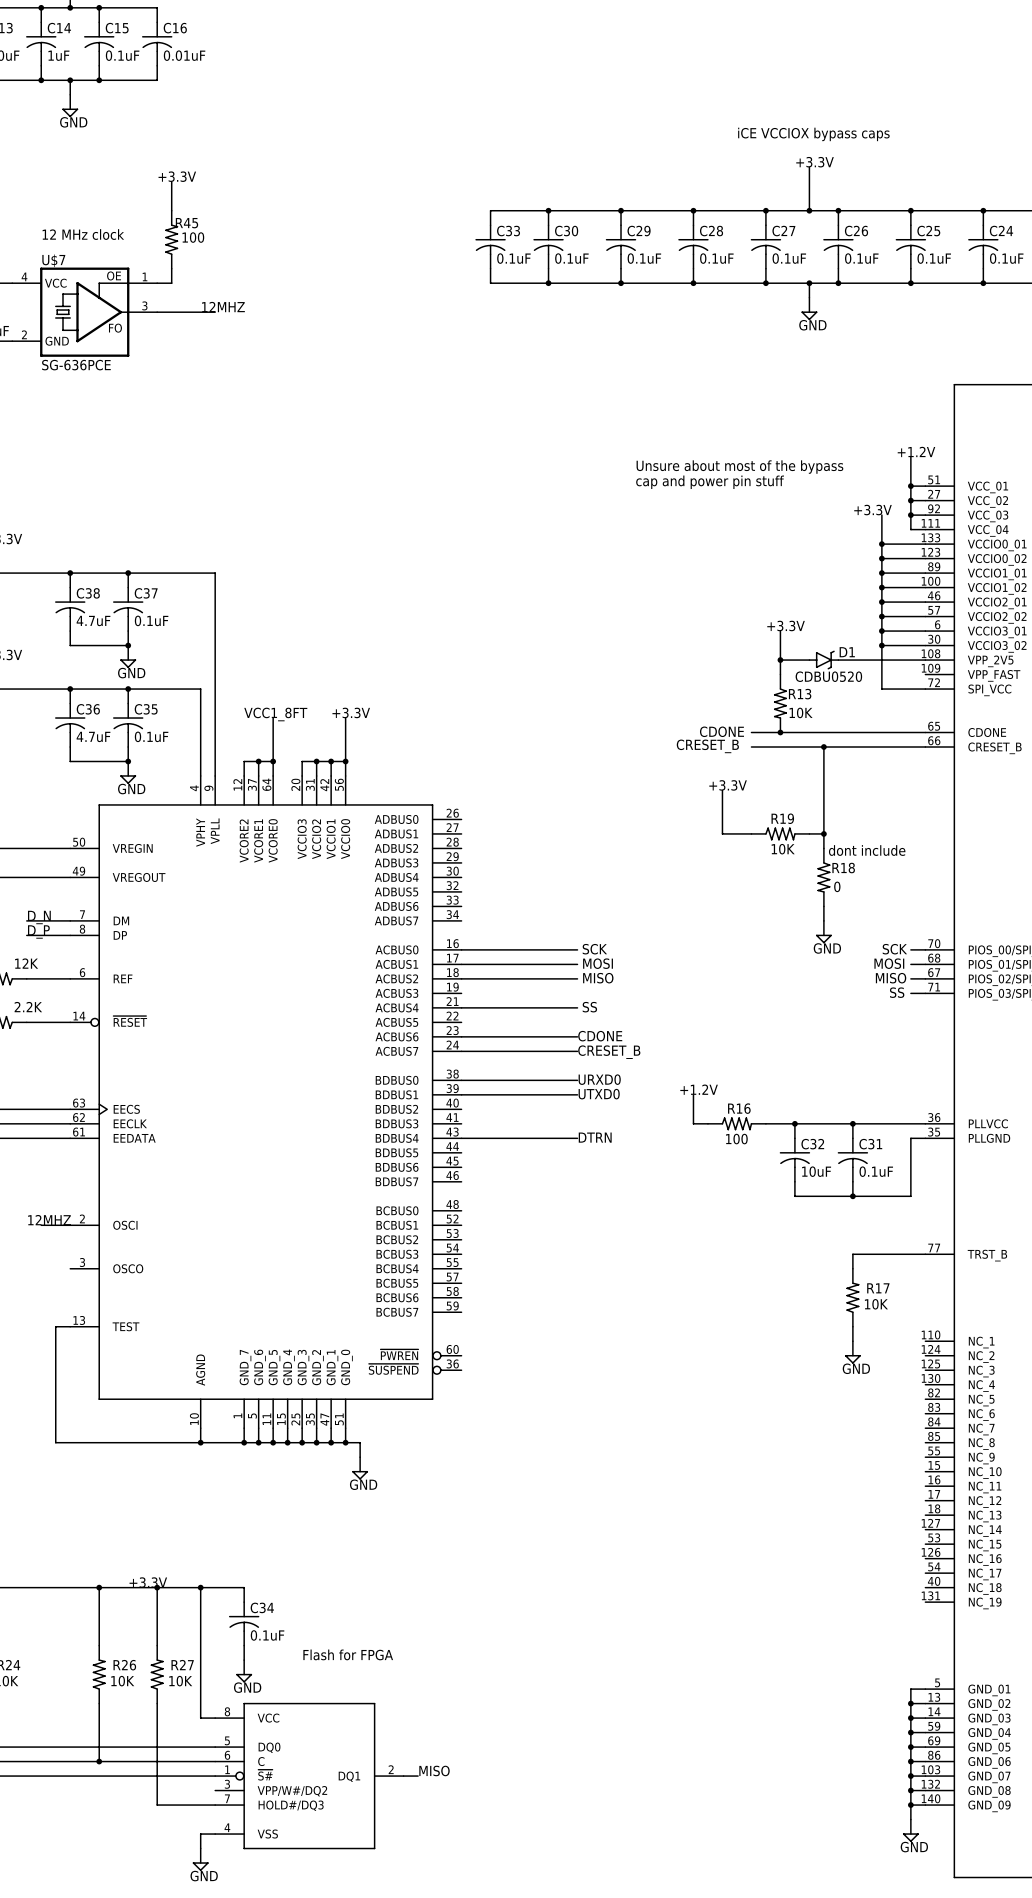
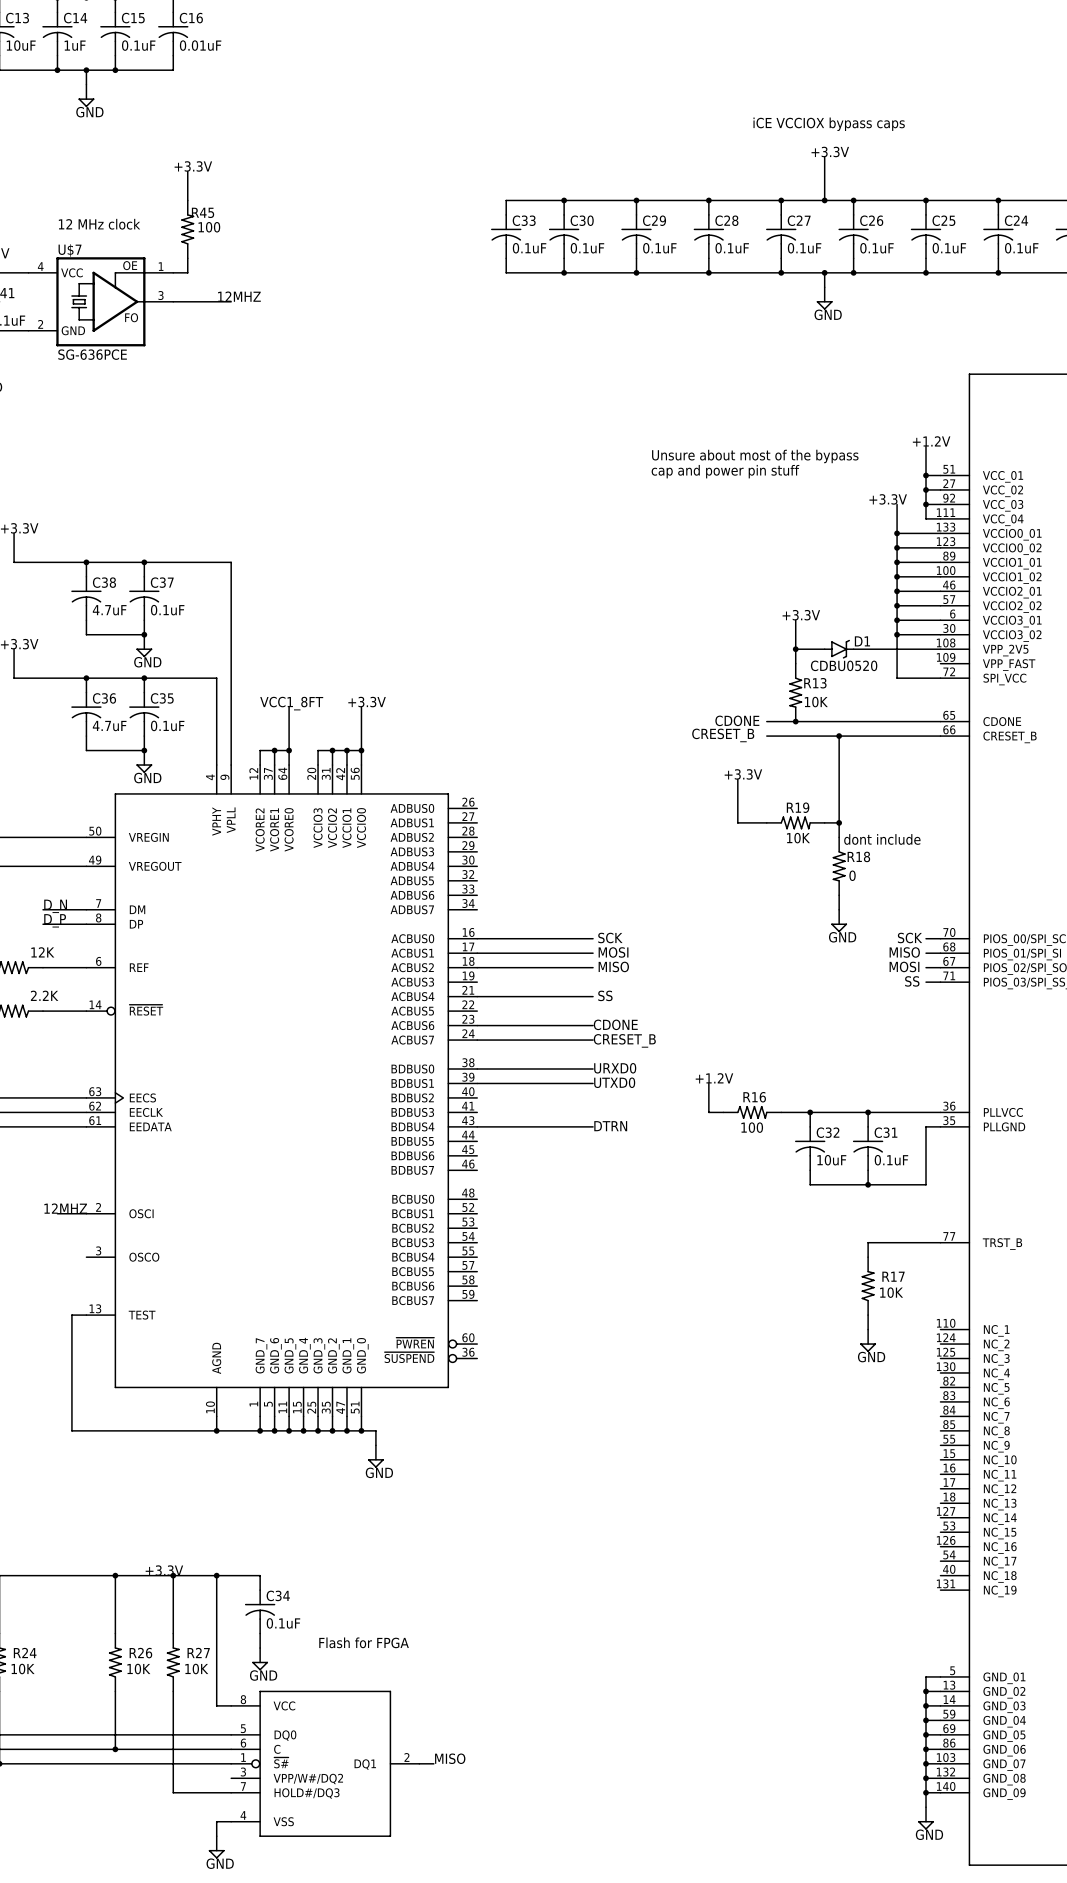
label: MOSI (889, 963) -> MISO (904, 952)
label: MISO (891, 978) -> MOSI (904, 966)

